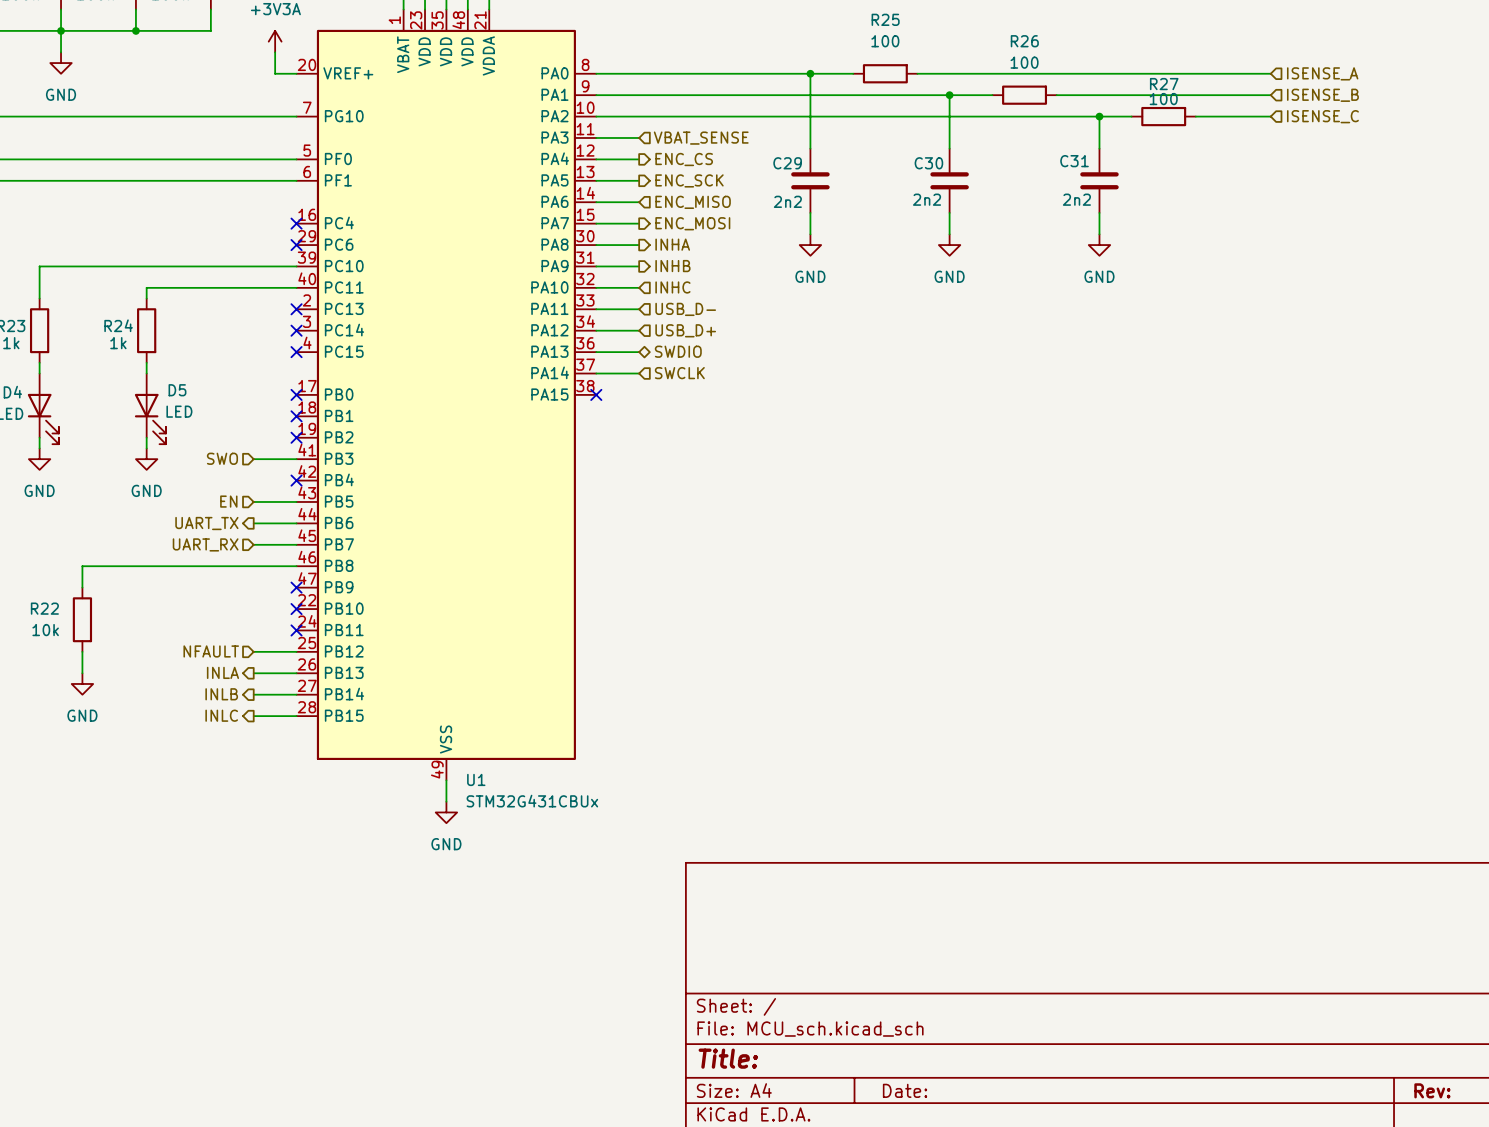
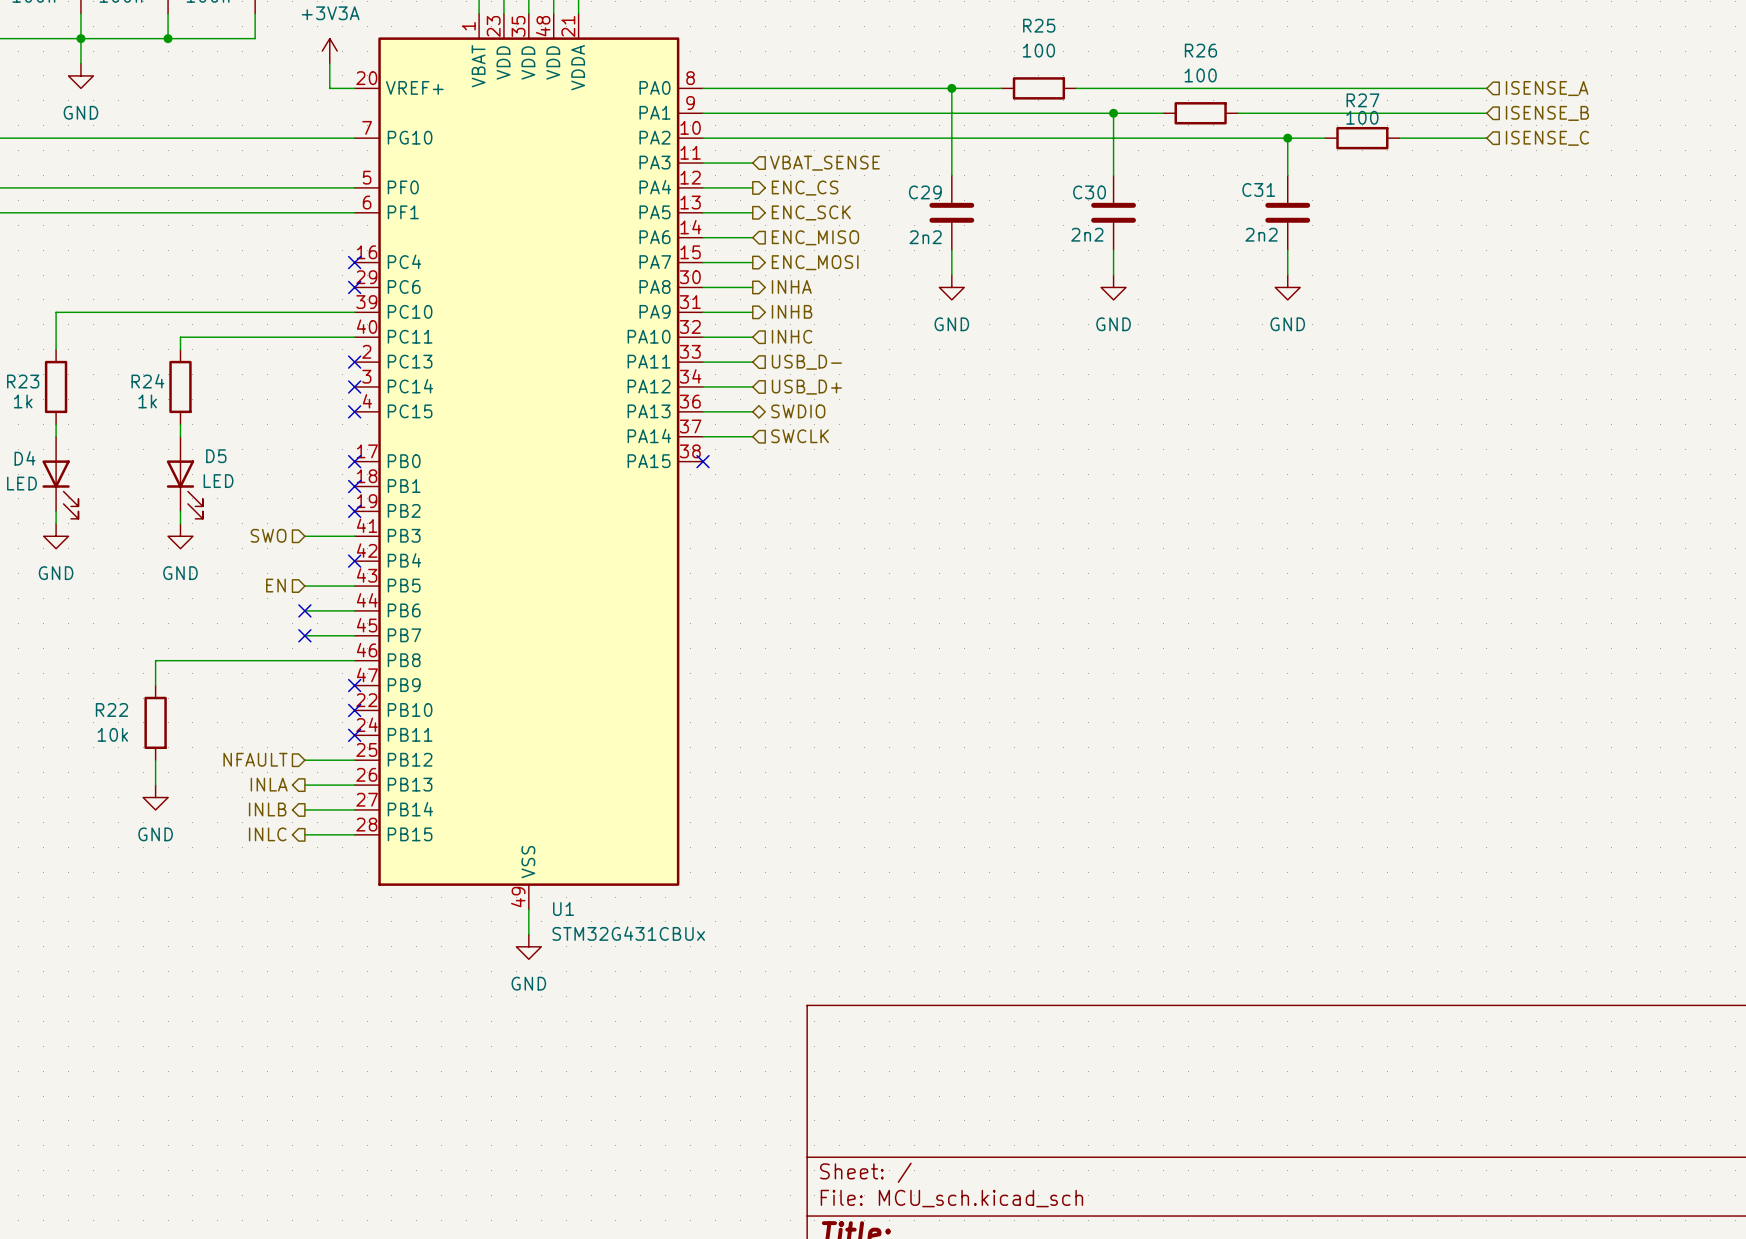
hierarchical label: UART_TX (206, 523) -> none
no-connect mark: none -> (304, 610)
hierarchical label: UART_RX (205, 544) -> none
no-connect mark: none -> (304, 635)
wire: (125, 566) (82, 566) (82, 587) -> (155, 660) (155, 685)
R22 position: (82, 619) -> (155, 722)
wire: (82, 651) (82, 673) -> (155, 760) (155, 785)
power symbol position: GND (82, 683) -> GND (155, 797)

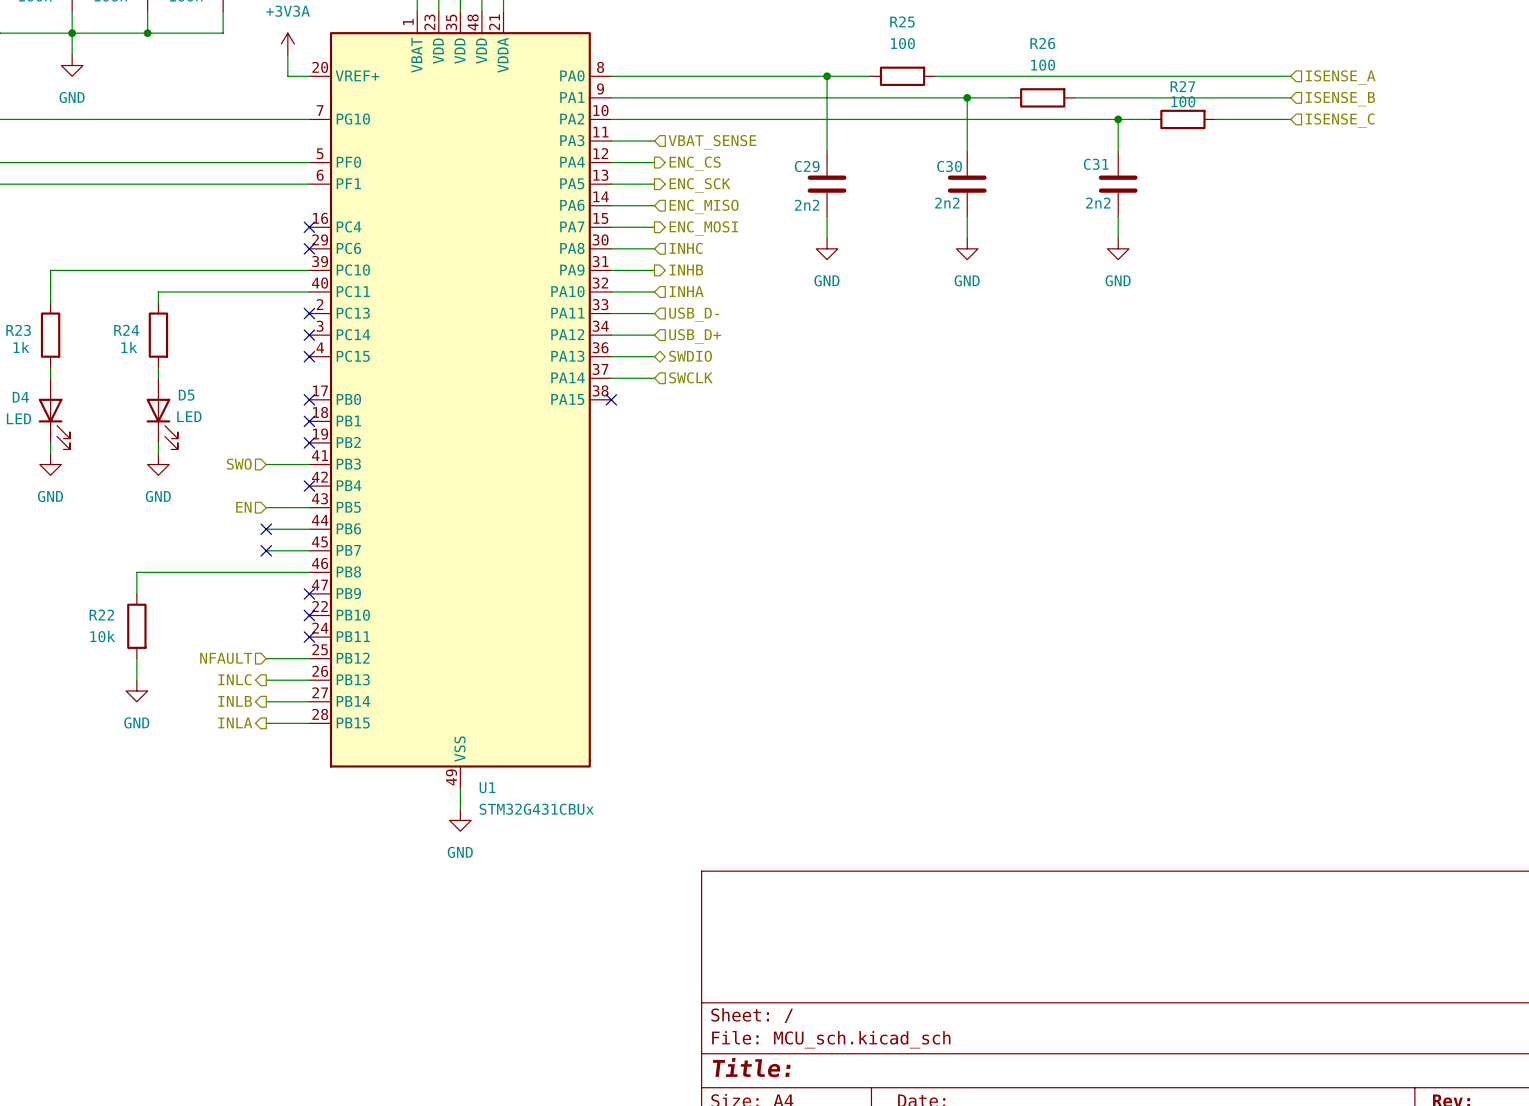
hierarchical label shape: output (791, 286) -> input (686, 248)
hierarchical label: INHA (791, 286) -> INHC (686, 248)
hierarchical label: INHC (792, 336) -> INHA (686, 291)
hierarchical label: INLA (269, 784) -> INLC (234, 679)
hierarchical label: INLC (267, 834) -> INLA (235, 722)

